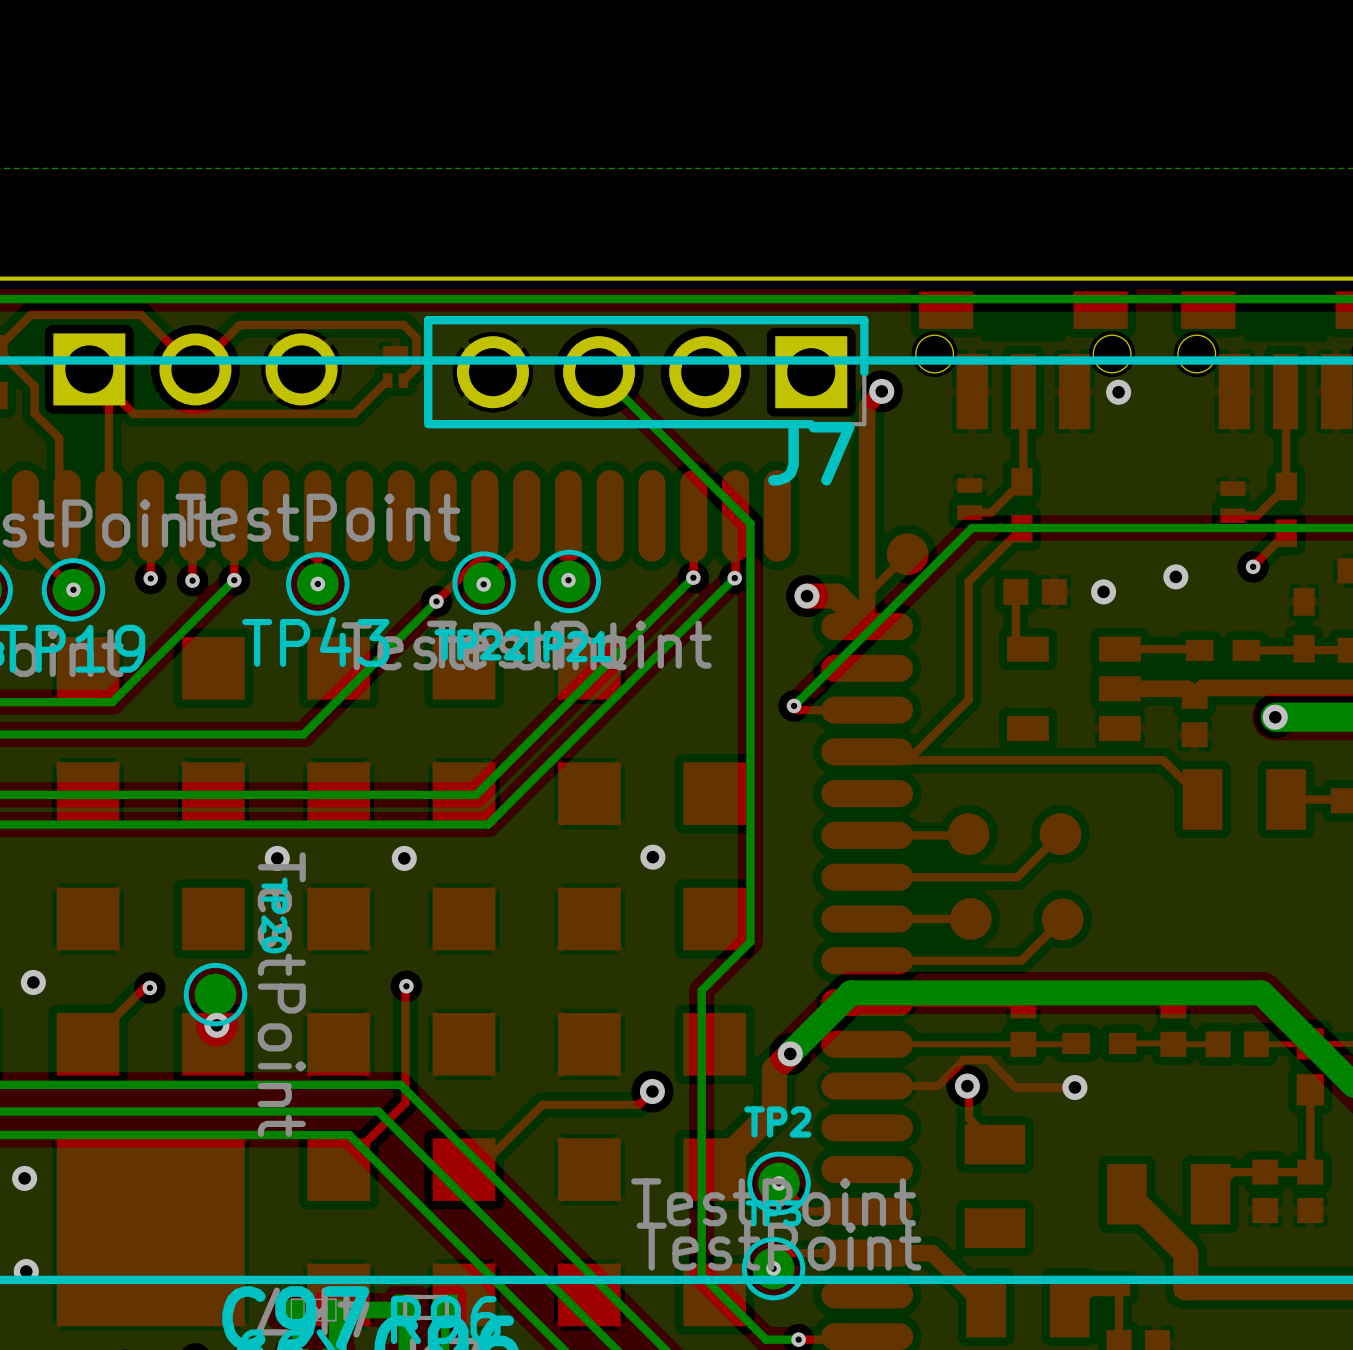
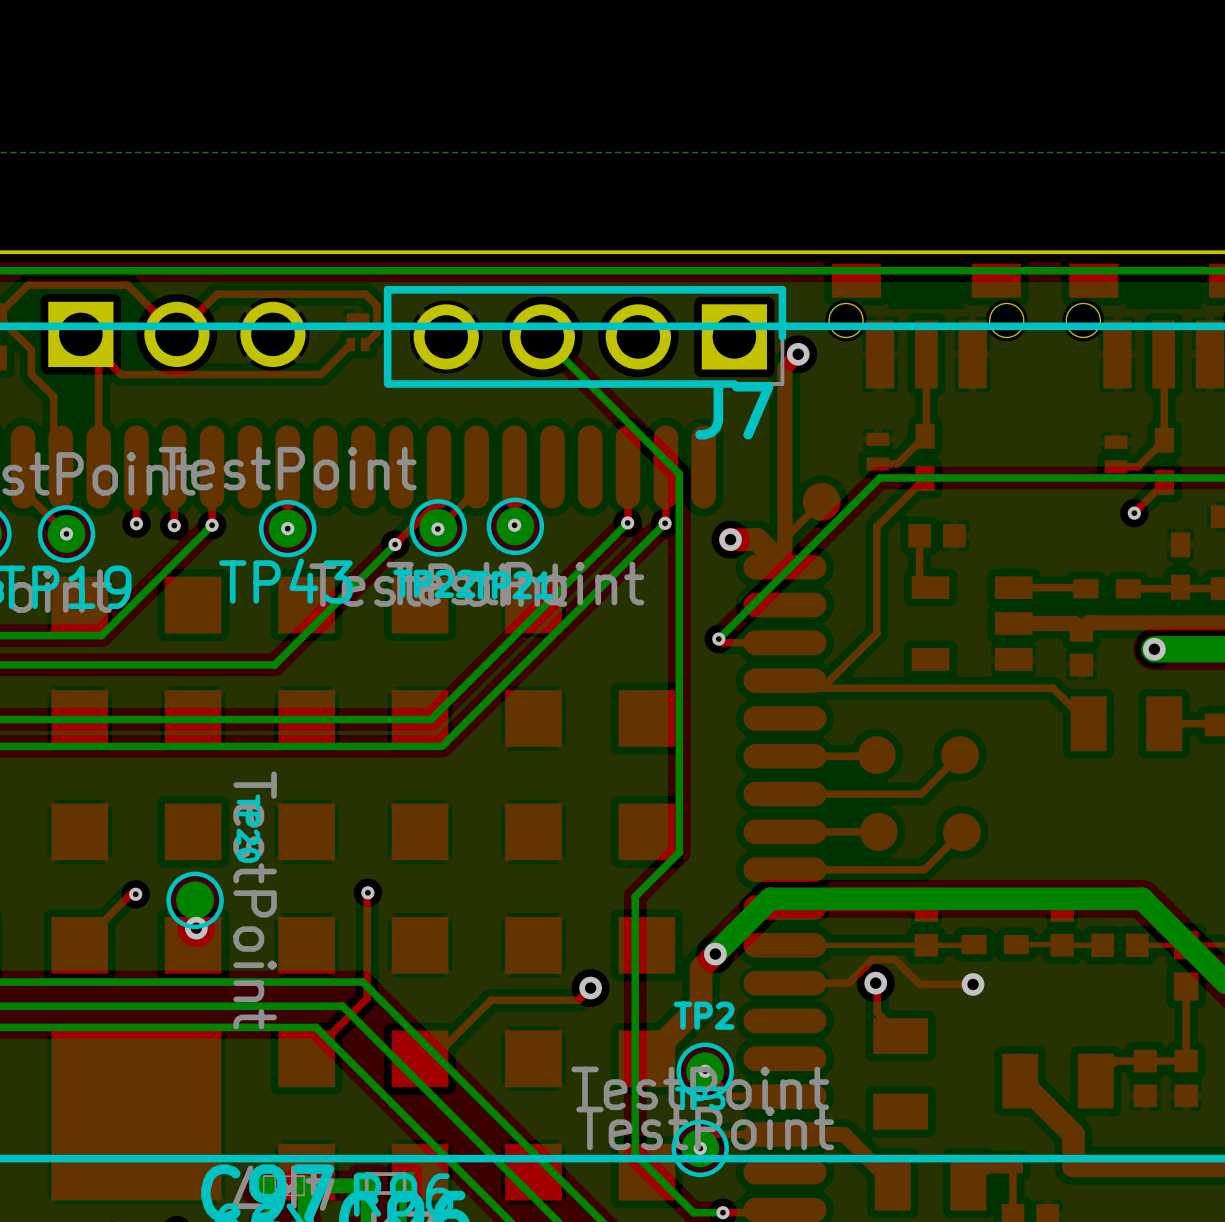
via: (1118, 392) -> none
via: (1175, 576) -> none
via: (1103, 591) -> none
via: (652, 857) -> none
via: (277, 858) -> none
via: (404, 858) -> none
via: (33, 982) -> none
via: (24, 1178) -> none
via: (26, 1271) -> none

